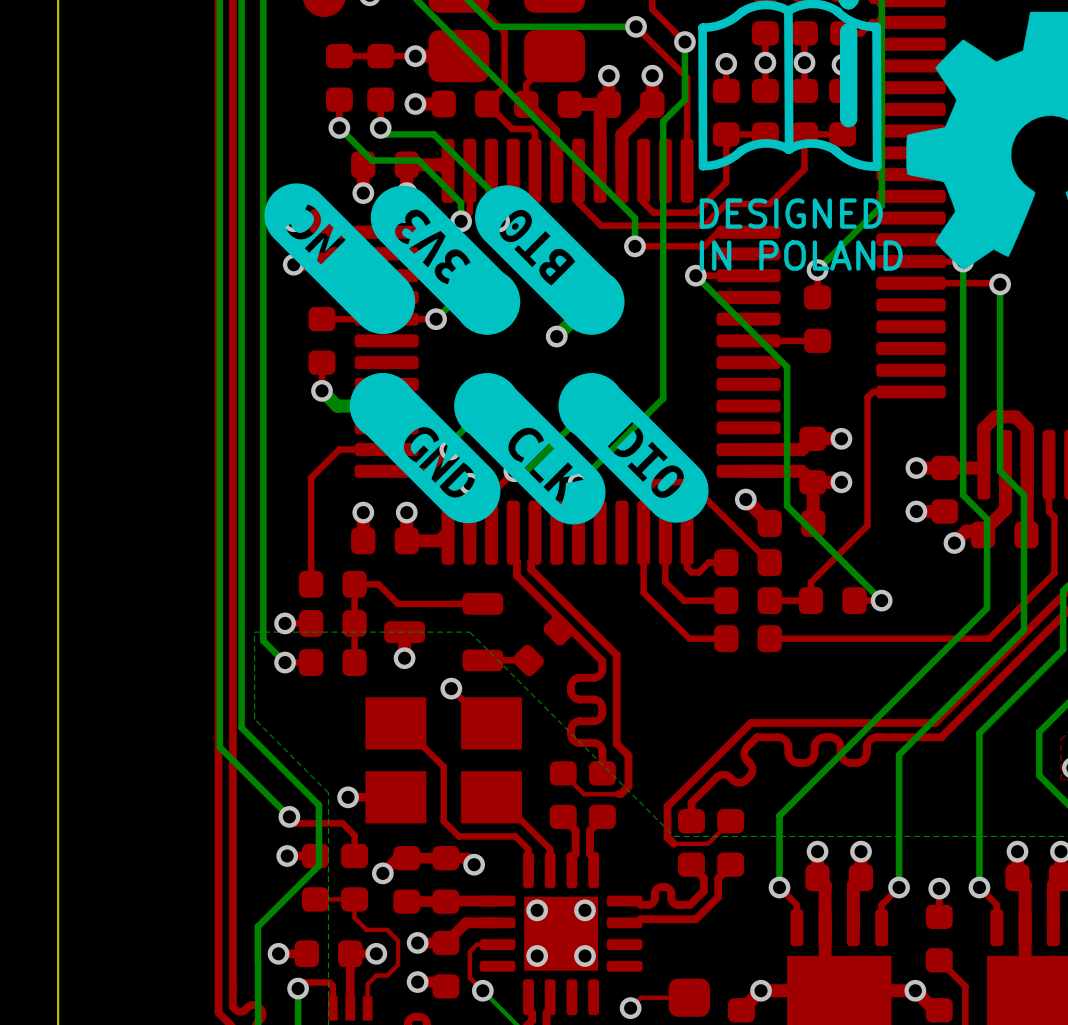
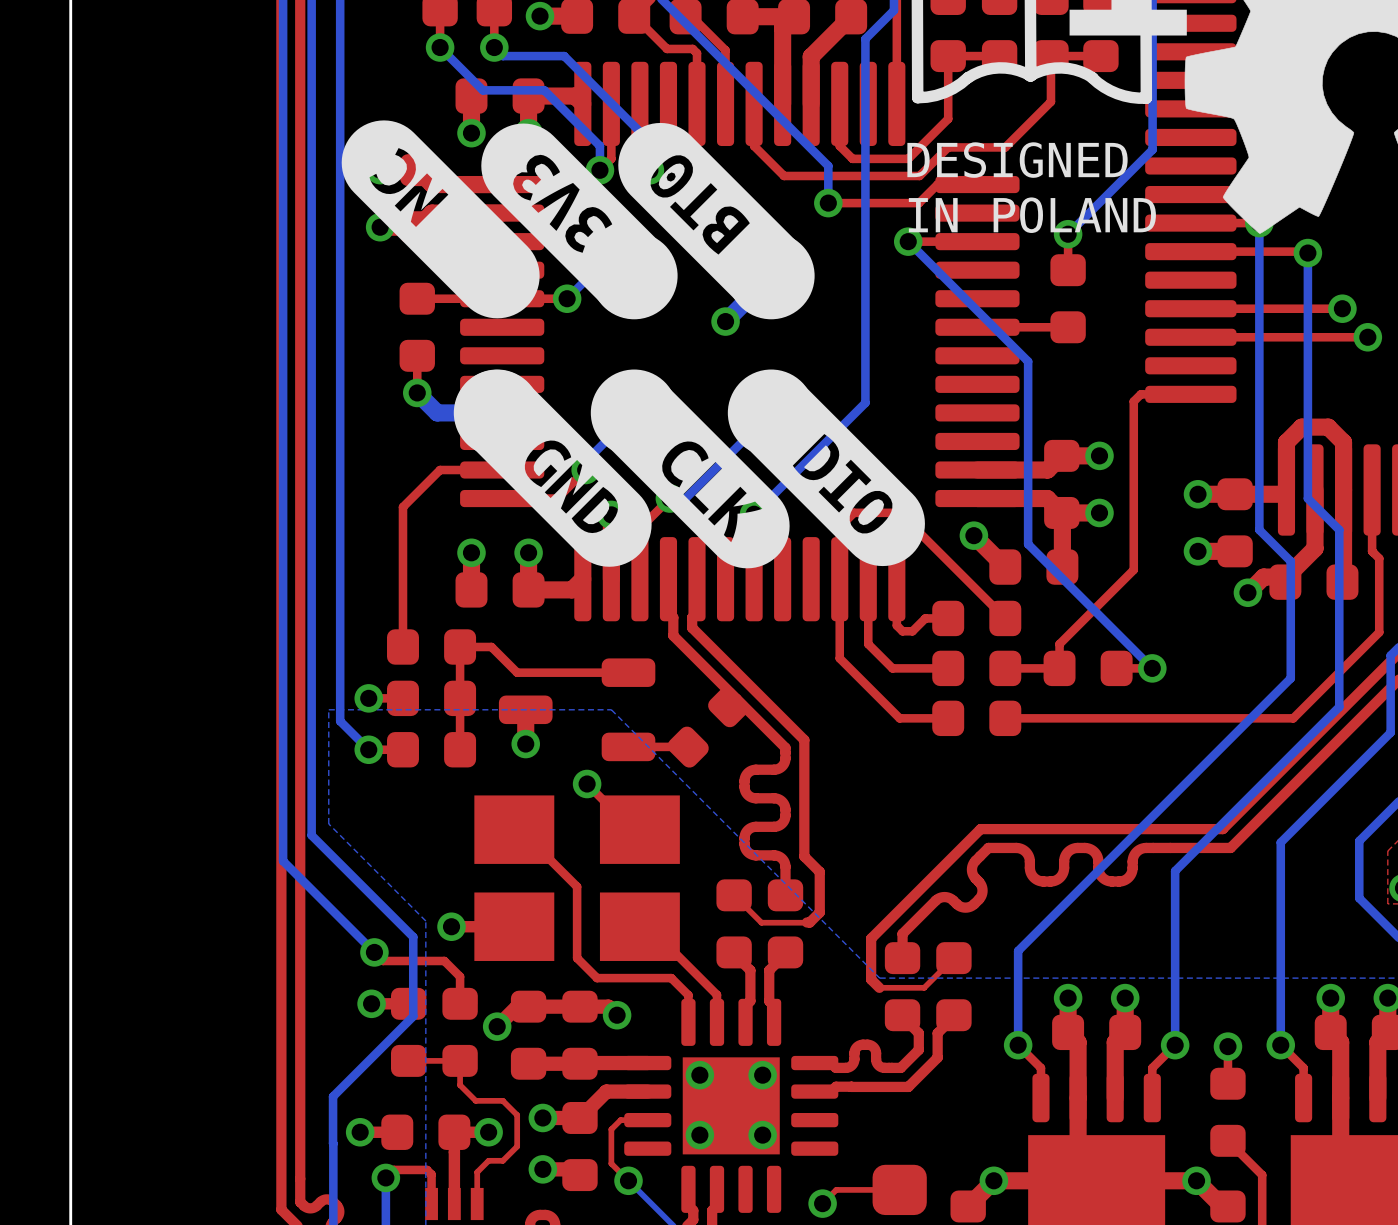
top track: none -> (1342, 308) (1190, 308)
via: none -> (1342, 308)
top track: none -> (1367, 337) (1190, 337)
via: none -> (1367, 337)

